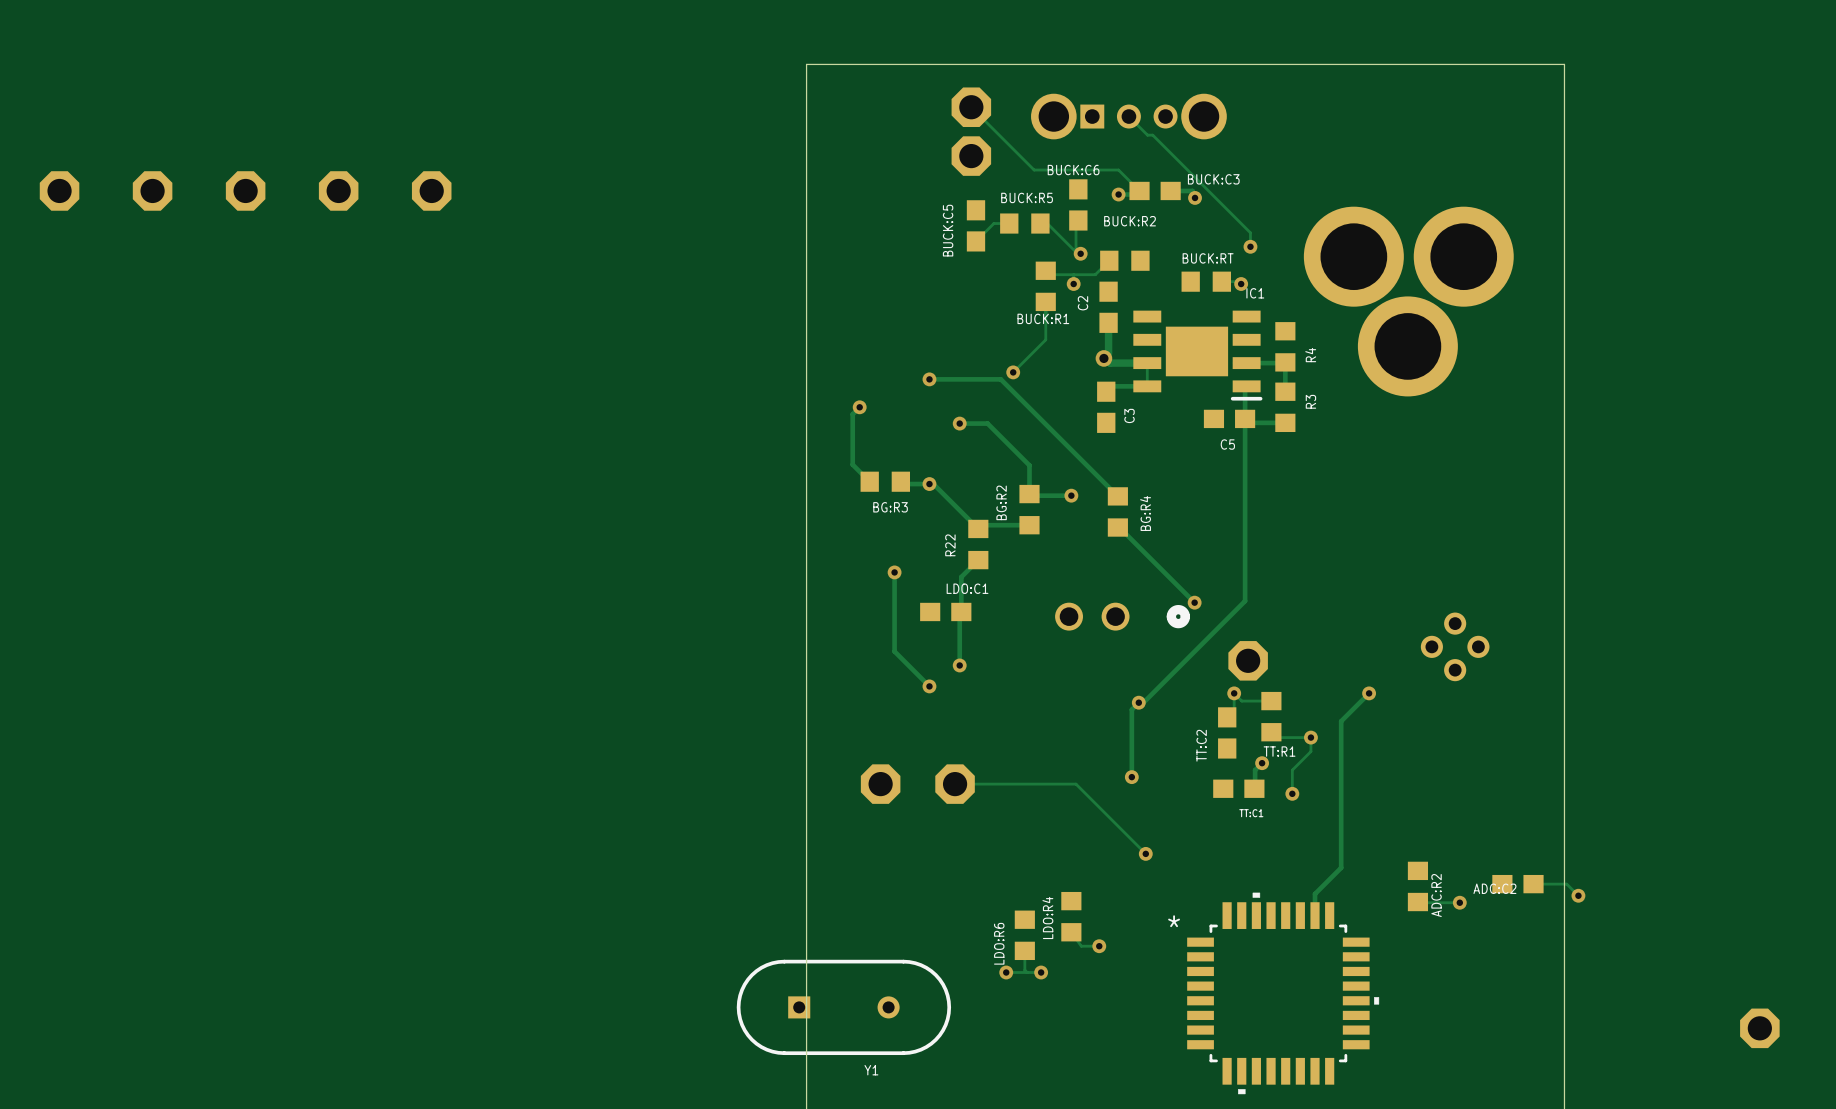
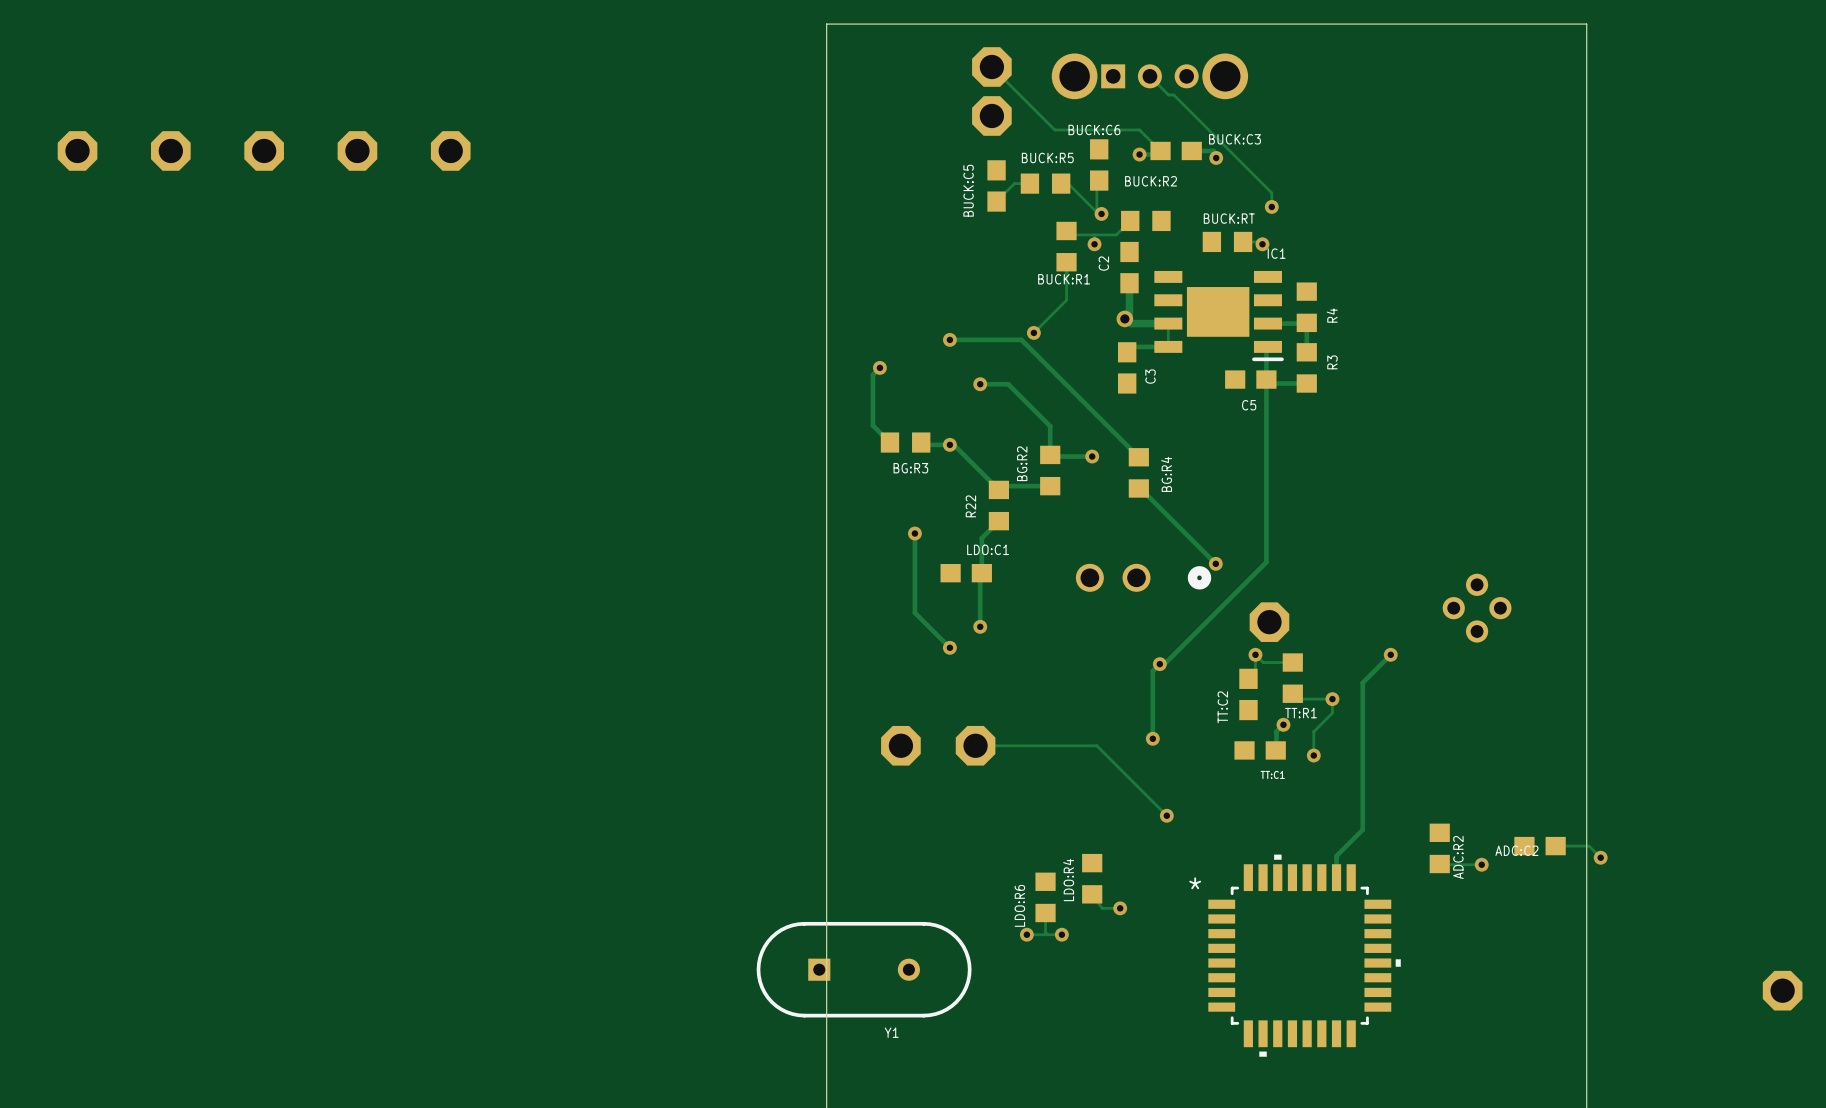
part: (1408, 301) -> none

